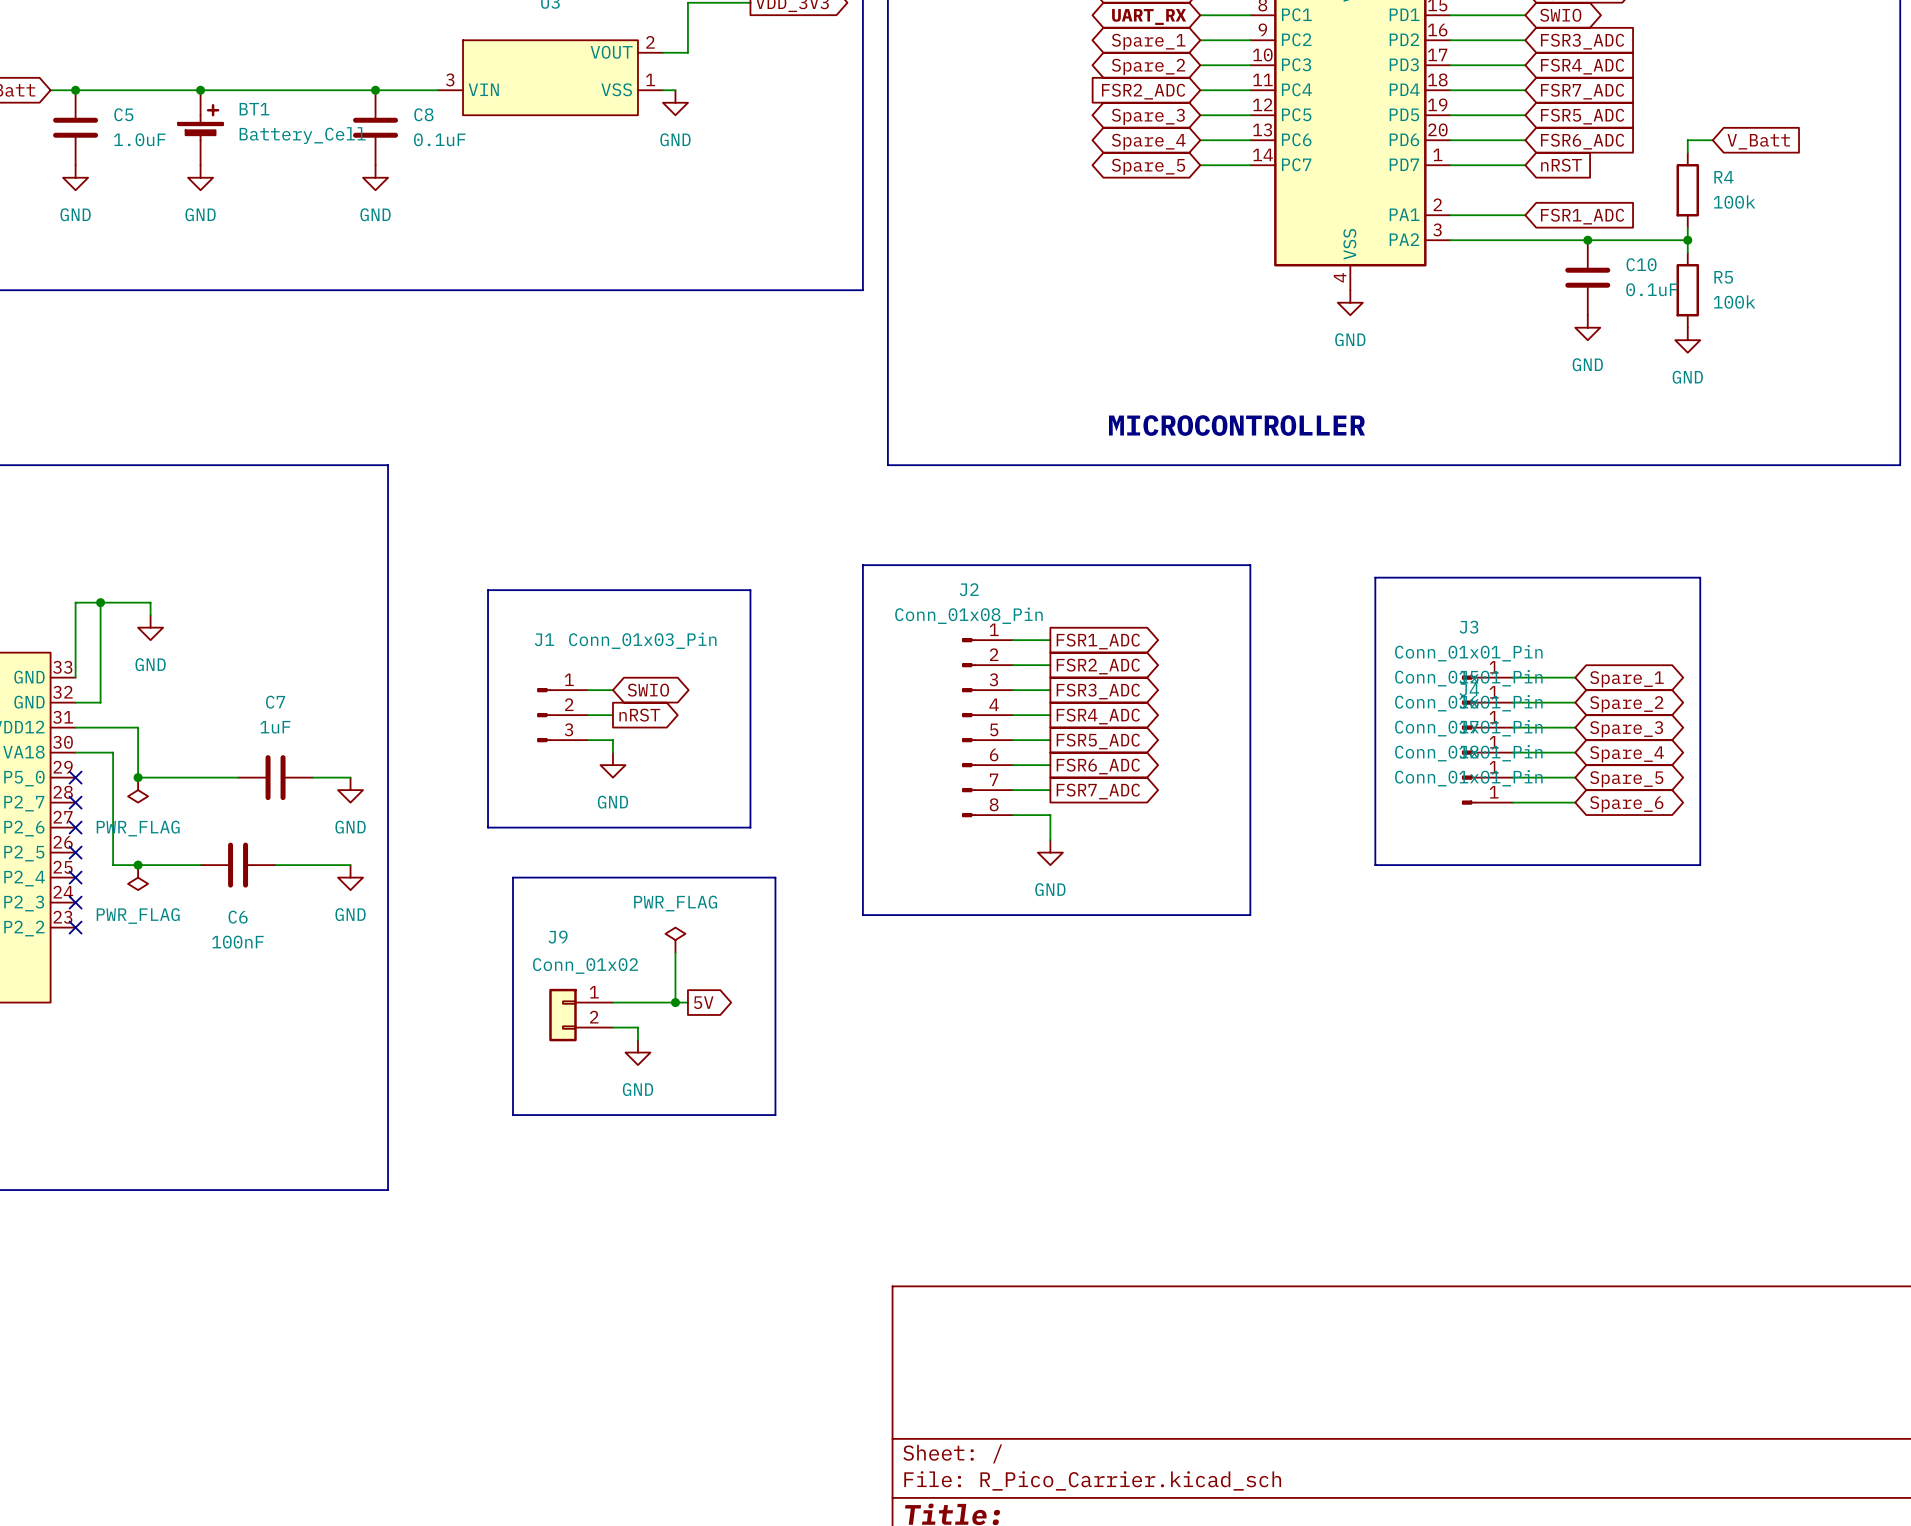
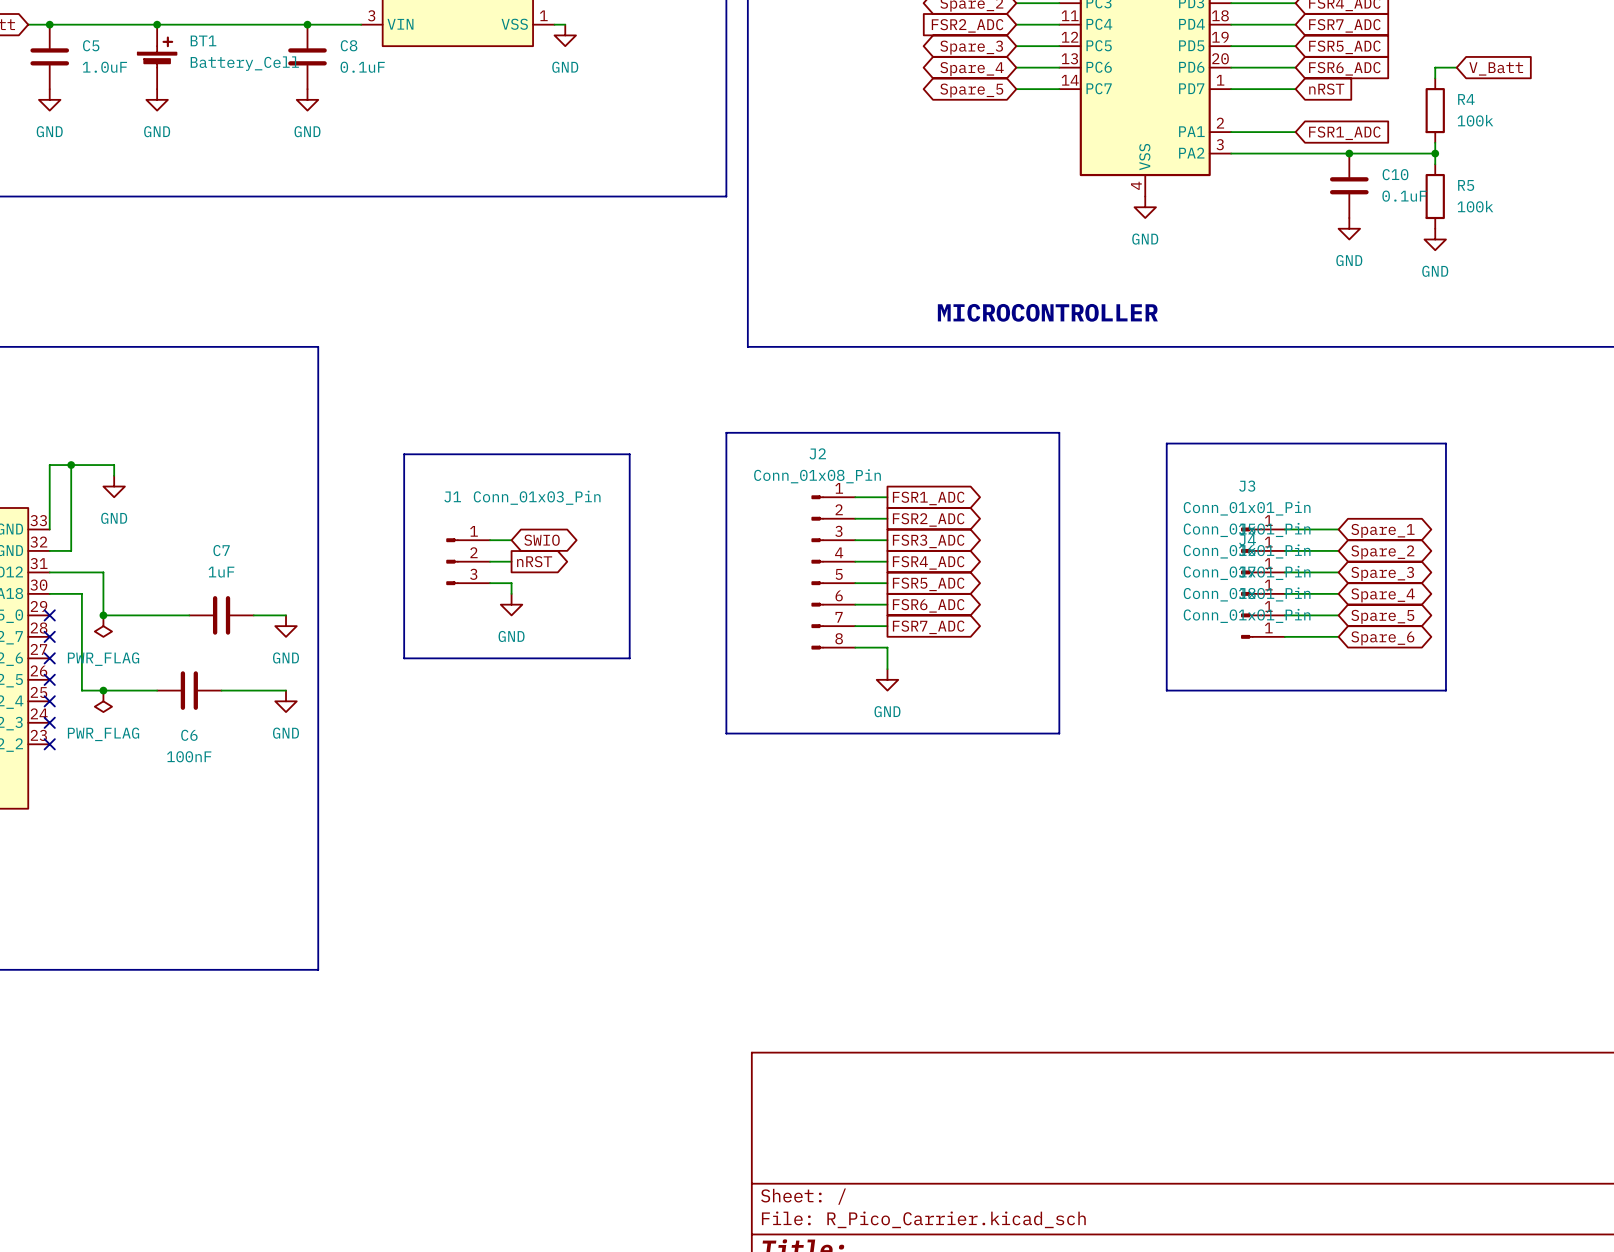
line: (513, 877) (775, 877) (775, 1115) (513, 1115) (513, 877) -> none
power symbol: PWR_FLAG (675, 940) -> none
wire: (675, 952) (675, 1002) -> none
wire: (612, 1002) (687, 1002) -> none
junction: (675, 1002) -> none
global label: 5V (703, 1002) -> none
J9: Conn_01x02 (581, 1015) -> none
wire: (612, 1027) (637, 1027) (637, 1040) -> none
power symbol: GND (637, 1052) -> none

